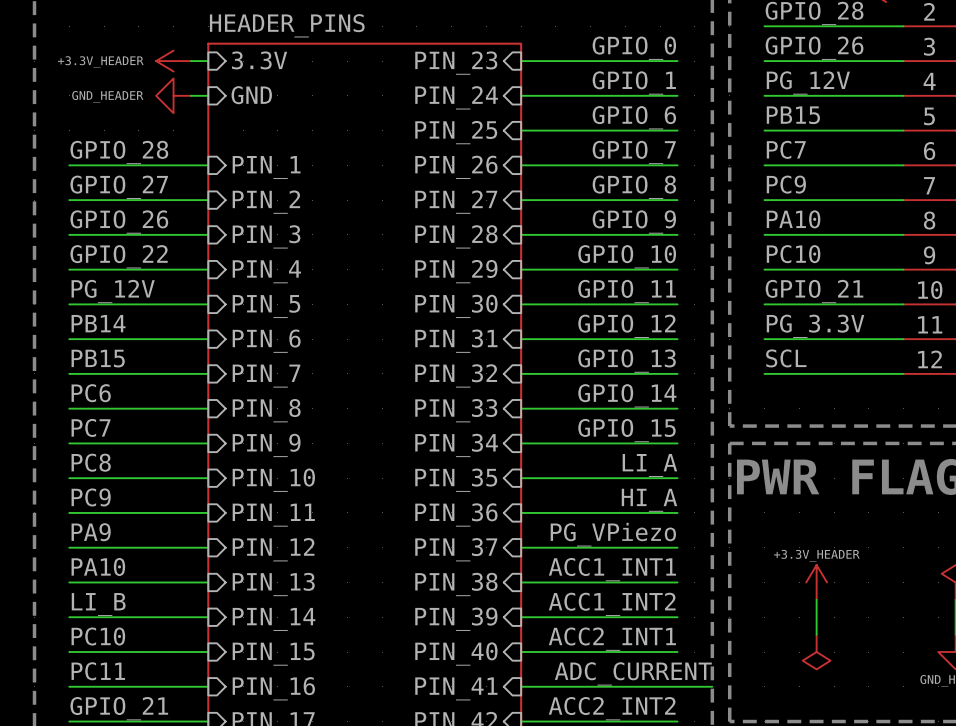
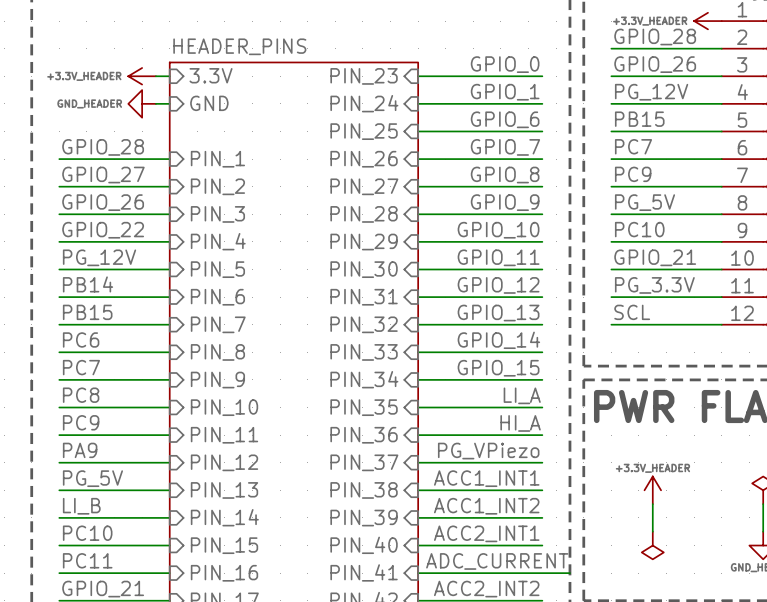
label: PA10 (793, 219) -> PG_5V (645, 202)
label: PA10 (98, 566) -> PG_5V (92, 478)

